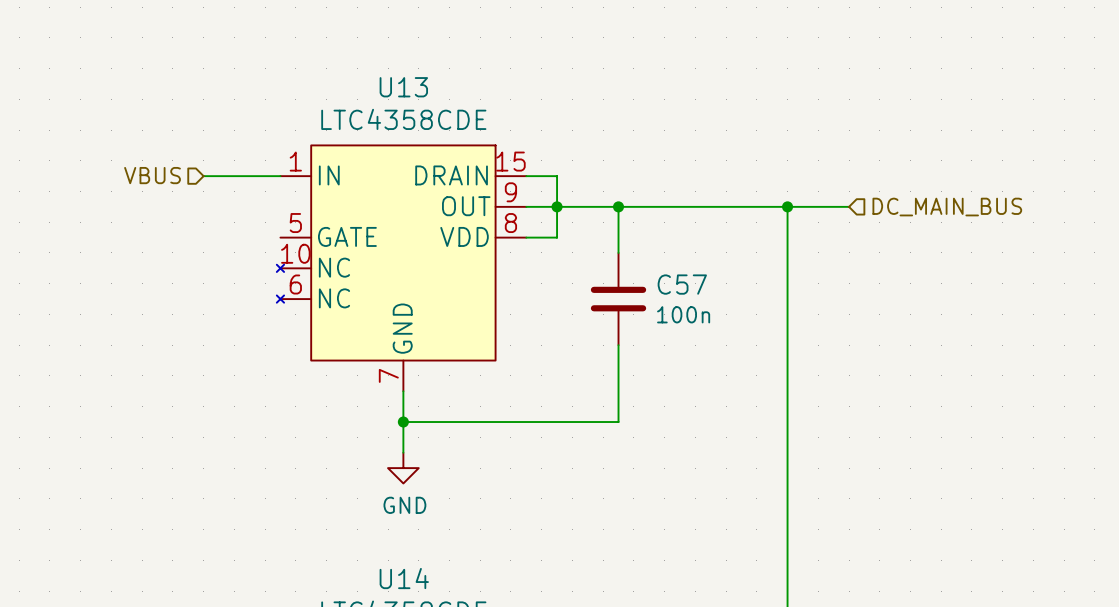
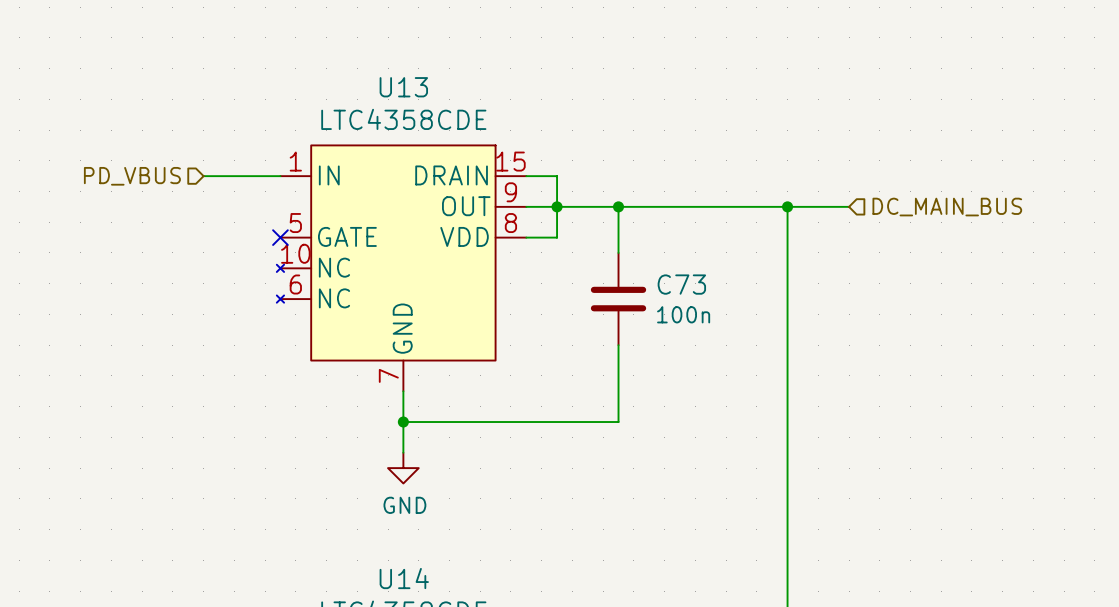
hierarchical label: VBUS (152, 175) -> PD_VBUS (132, 176)
no-connect mark: none -> (280, 237)
C57 name: C57 (682, 284) -> C73 (681, 284)

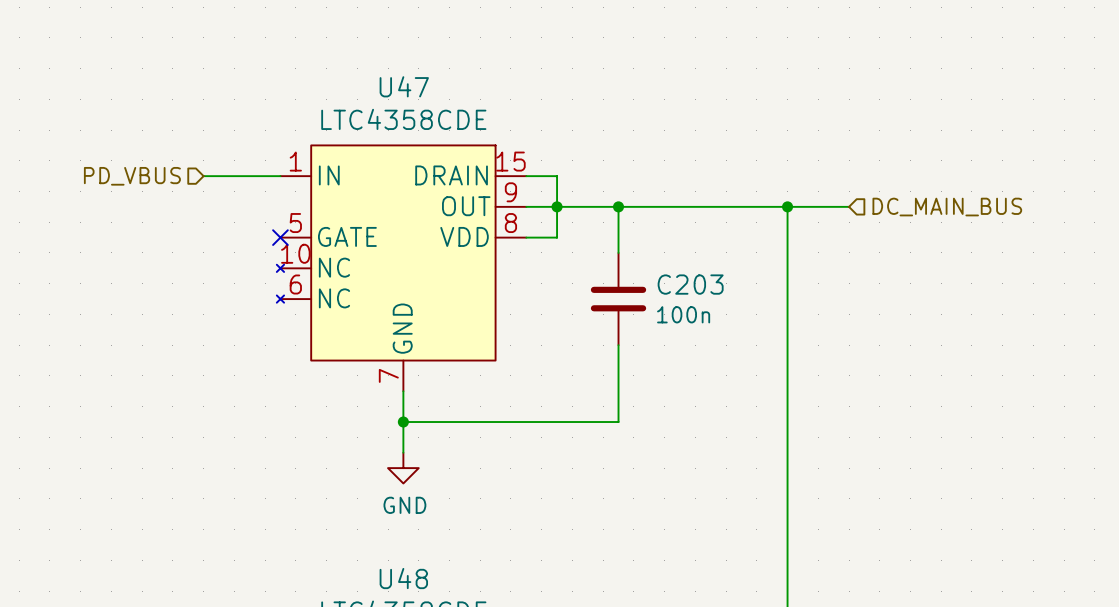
U13 name: U13 (403, 87) -> U47 (404, 86)
C73 name: C73 (681, 284) -> C203 (690, 284)
U14 name: U14 (404, 578) -> U48 (403, 578)

